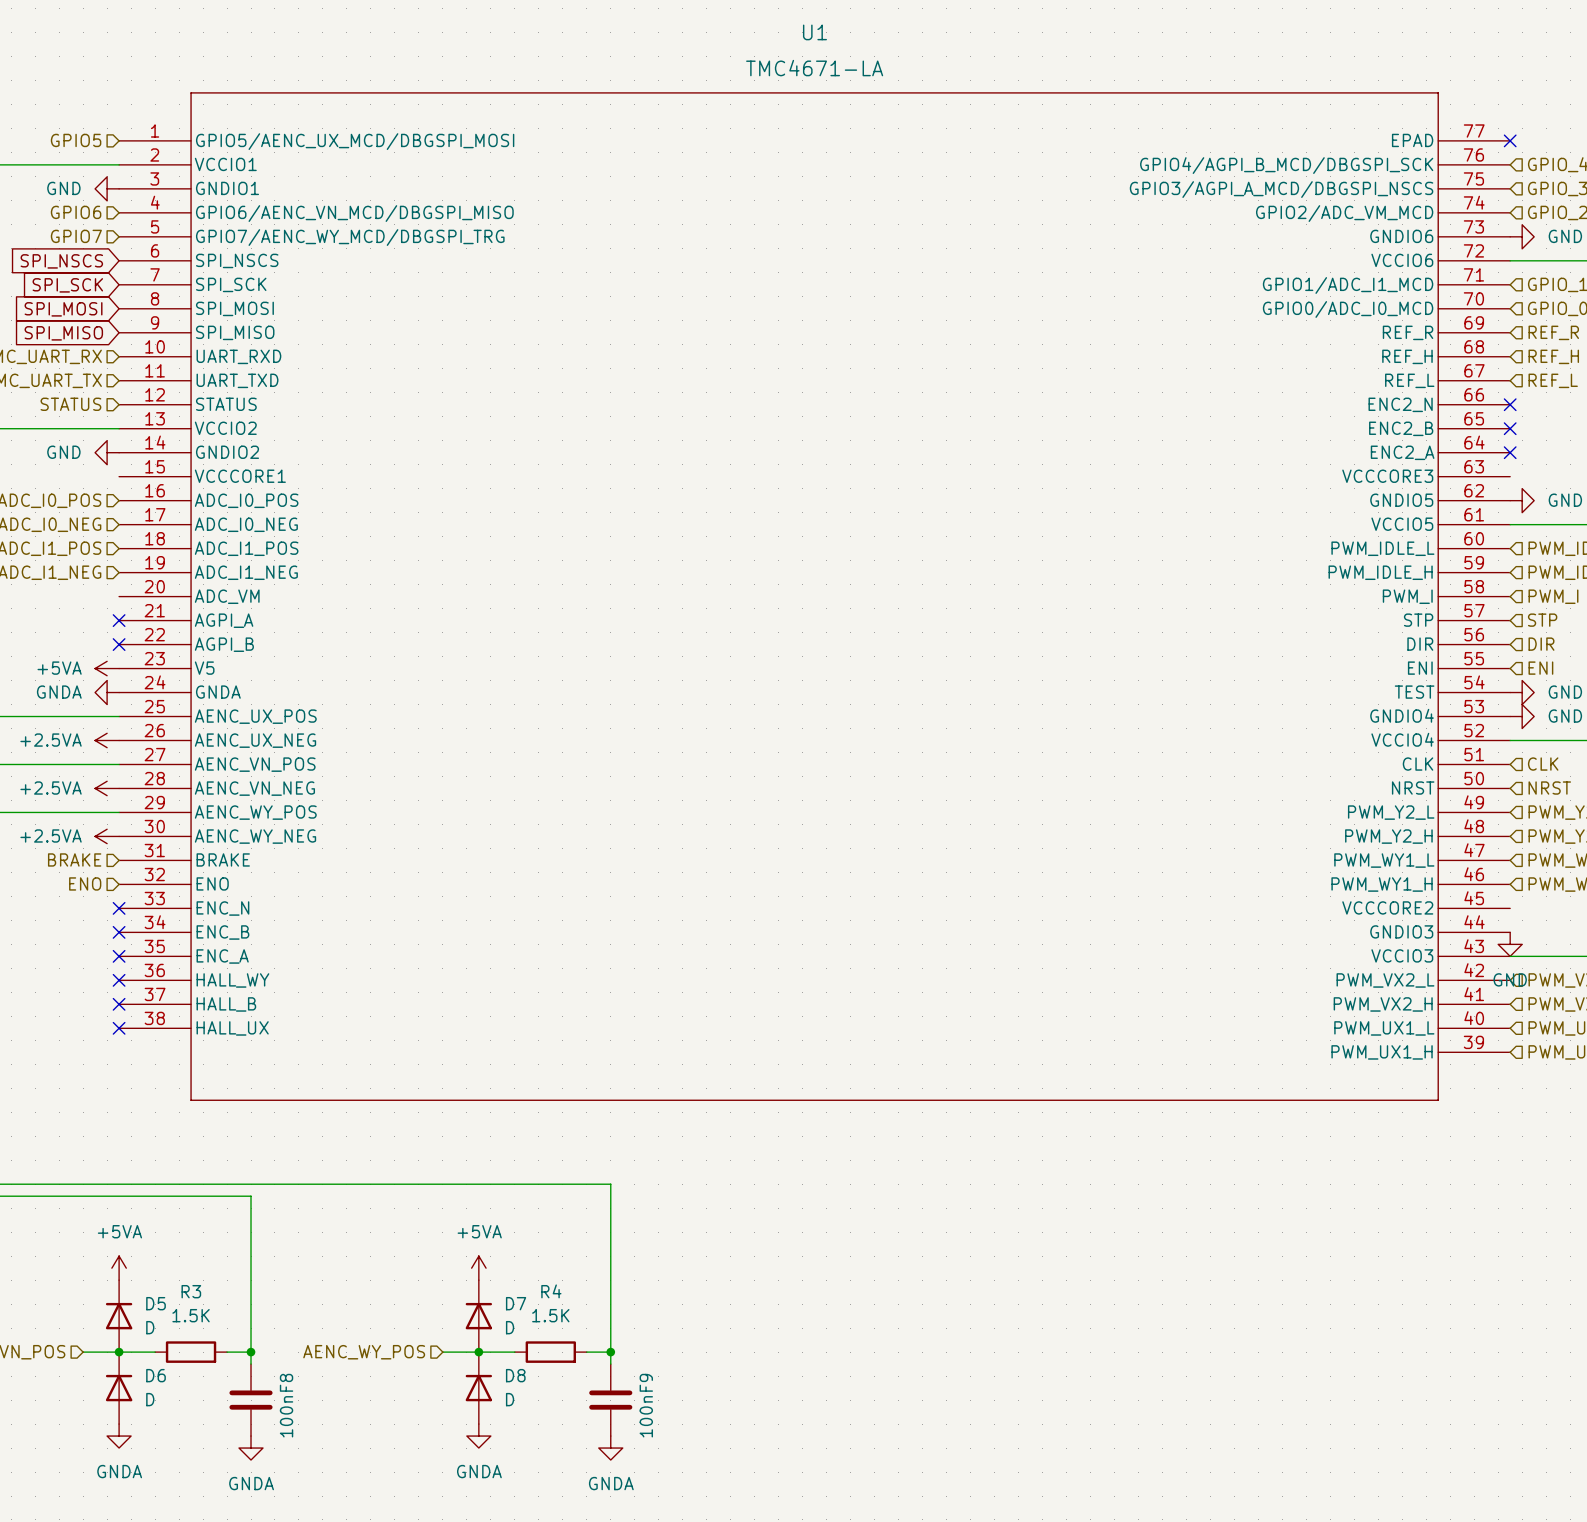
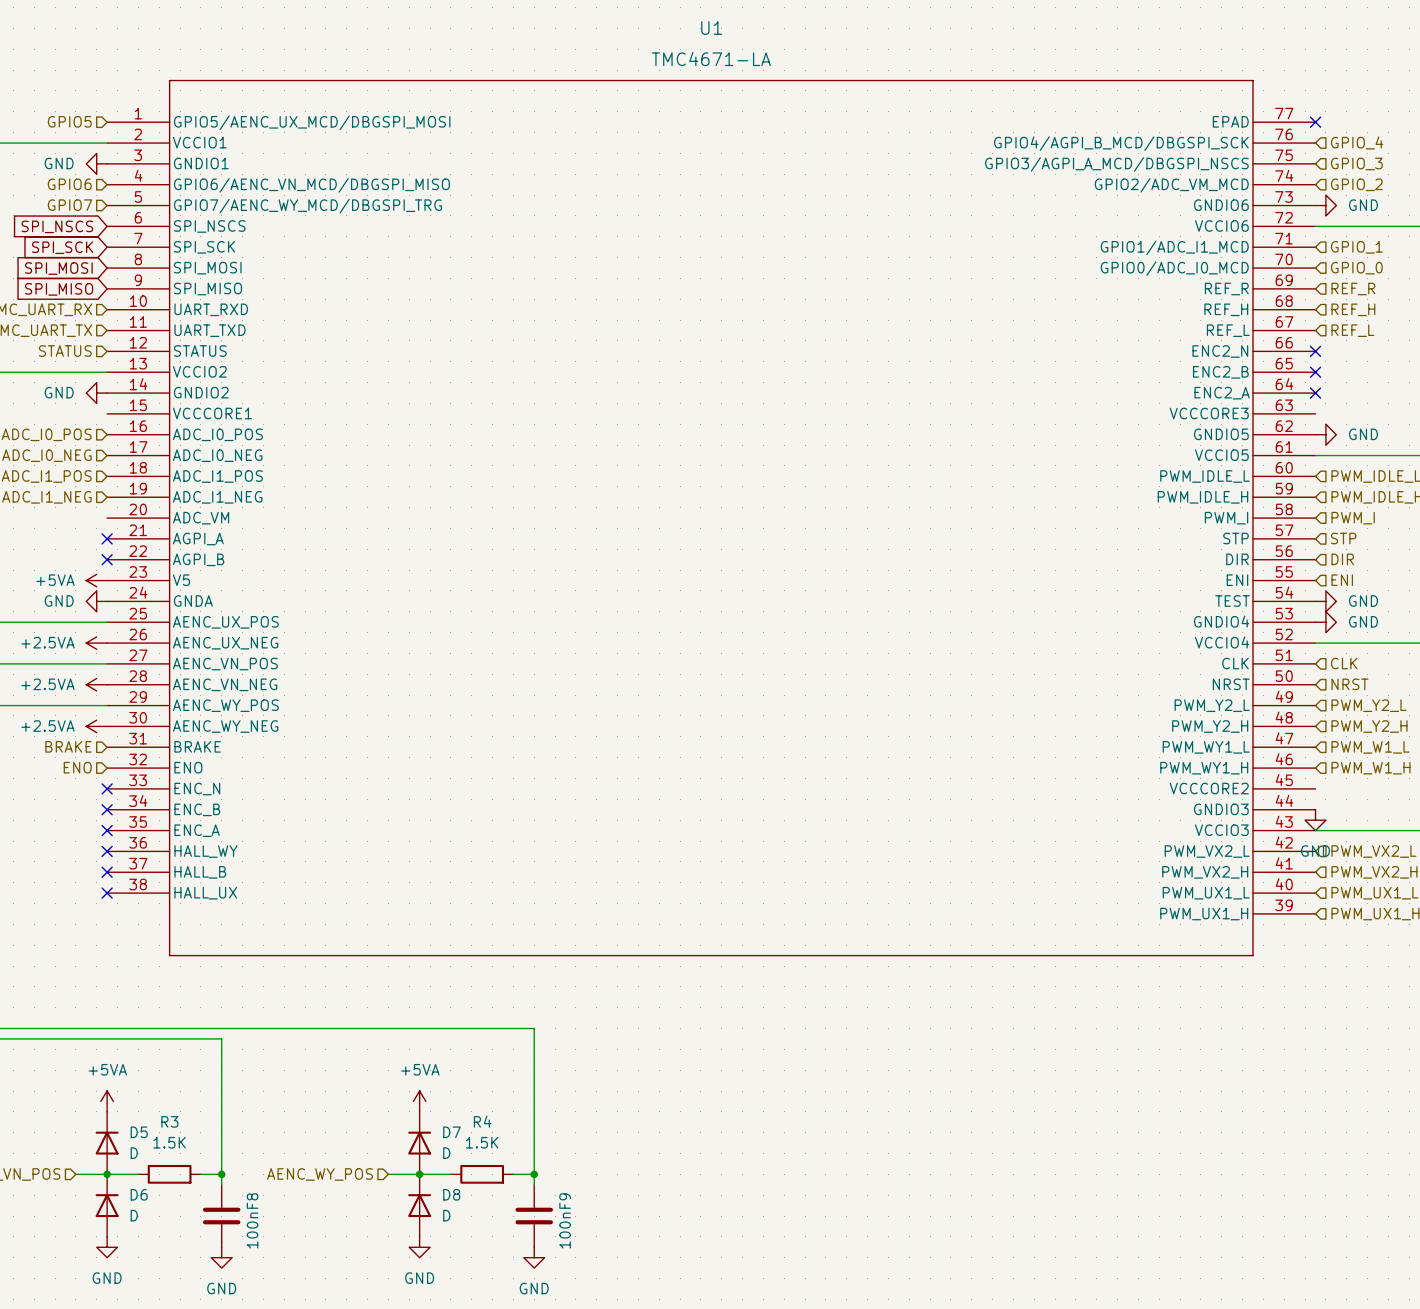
power symbol: GNDA (107, 692) -> GND (96, 601)
power symbol: GNDA (119, 1436) -> GND (107, 1247)
power symbol: GNDA (478, 1436) -> GND (419, 1247)
power symbol: GNDA (251, 1448) -> GND (221, 1257)
power symbol: GNDA (610, 1448) -> GND (534, 1257)

